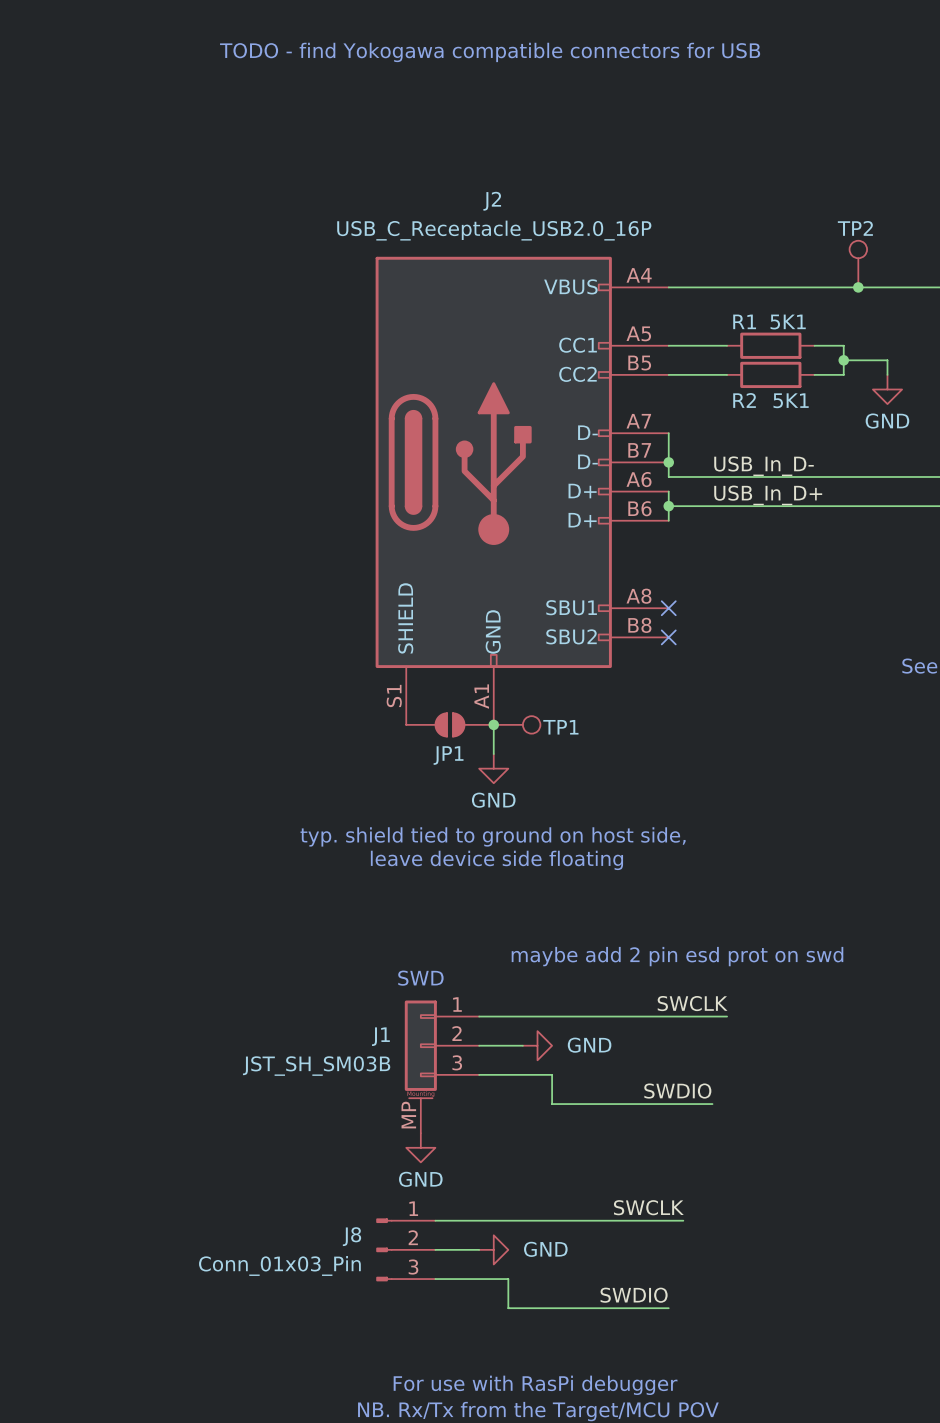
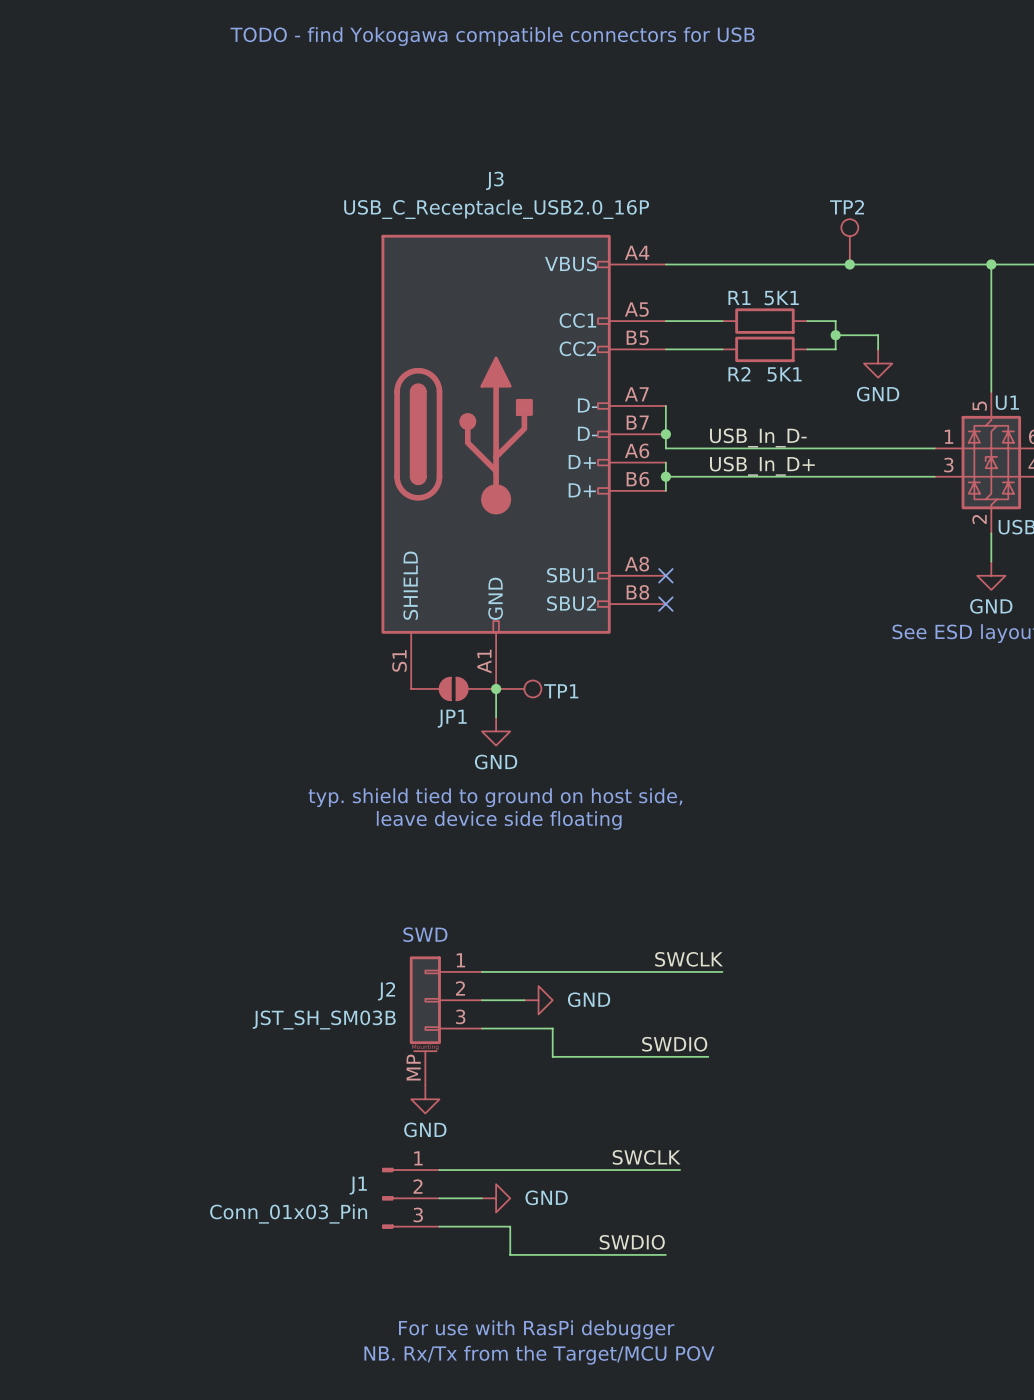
J2 name: J2 (492, 201) -> J3 (494, 180)
text: maybe add 2 pin esd prot on swd (677, 956) -> none
J1 name: J1 (380, 1036) -> J2 (386, 991)
J8 name: J8 (351, 1236) -> J1 (358, 1185)

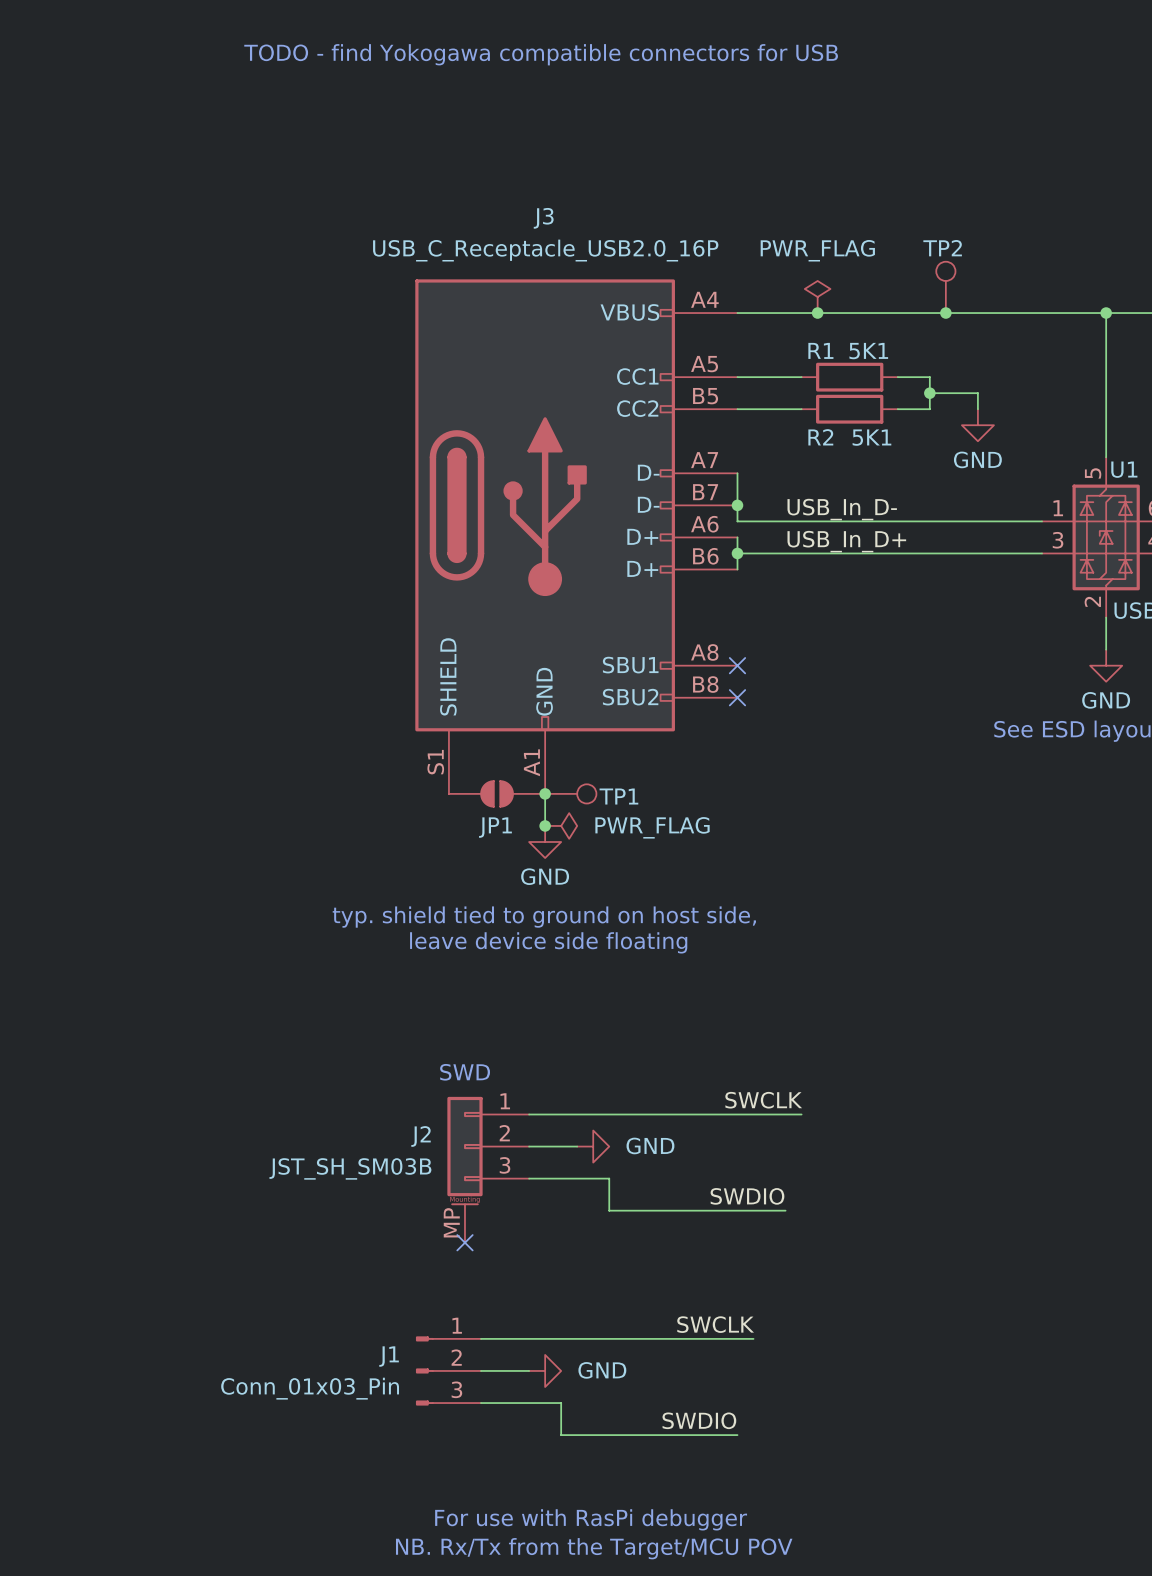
power symbol: none -> PWR_FLAG (817, 297)
junction: none -> (817, 313)
junction: none -> (545, 825)
power symbol: none -> PWR_FLAG (561, 825)
no-connect mark: none -> (464, 1242)
power symbol: GND (425, 1099) -> none

